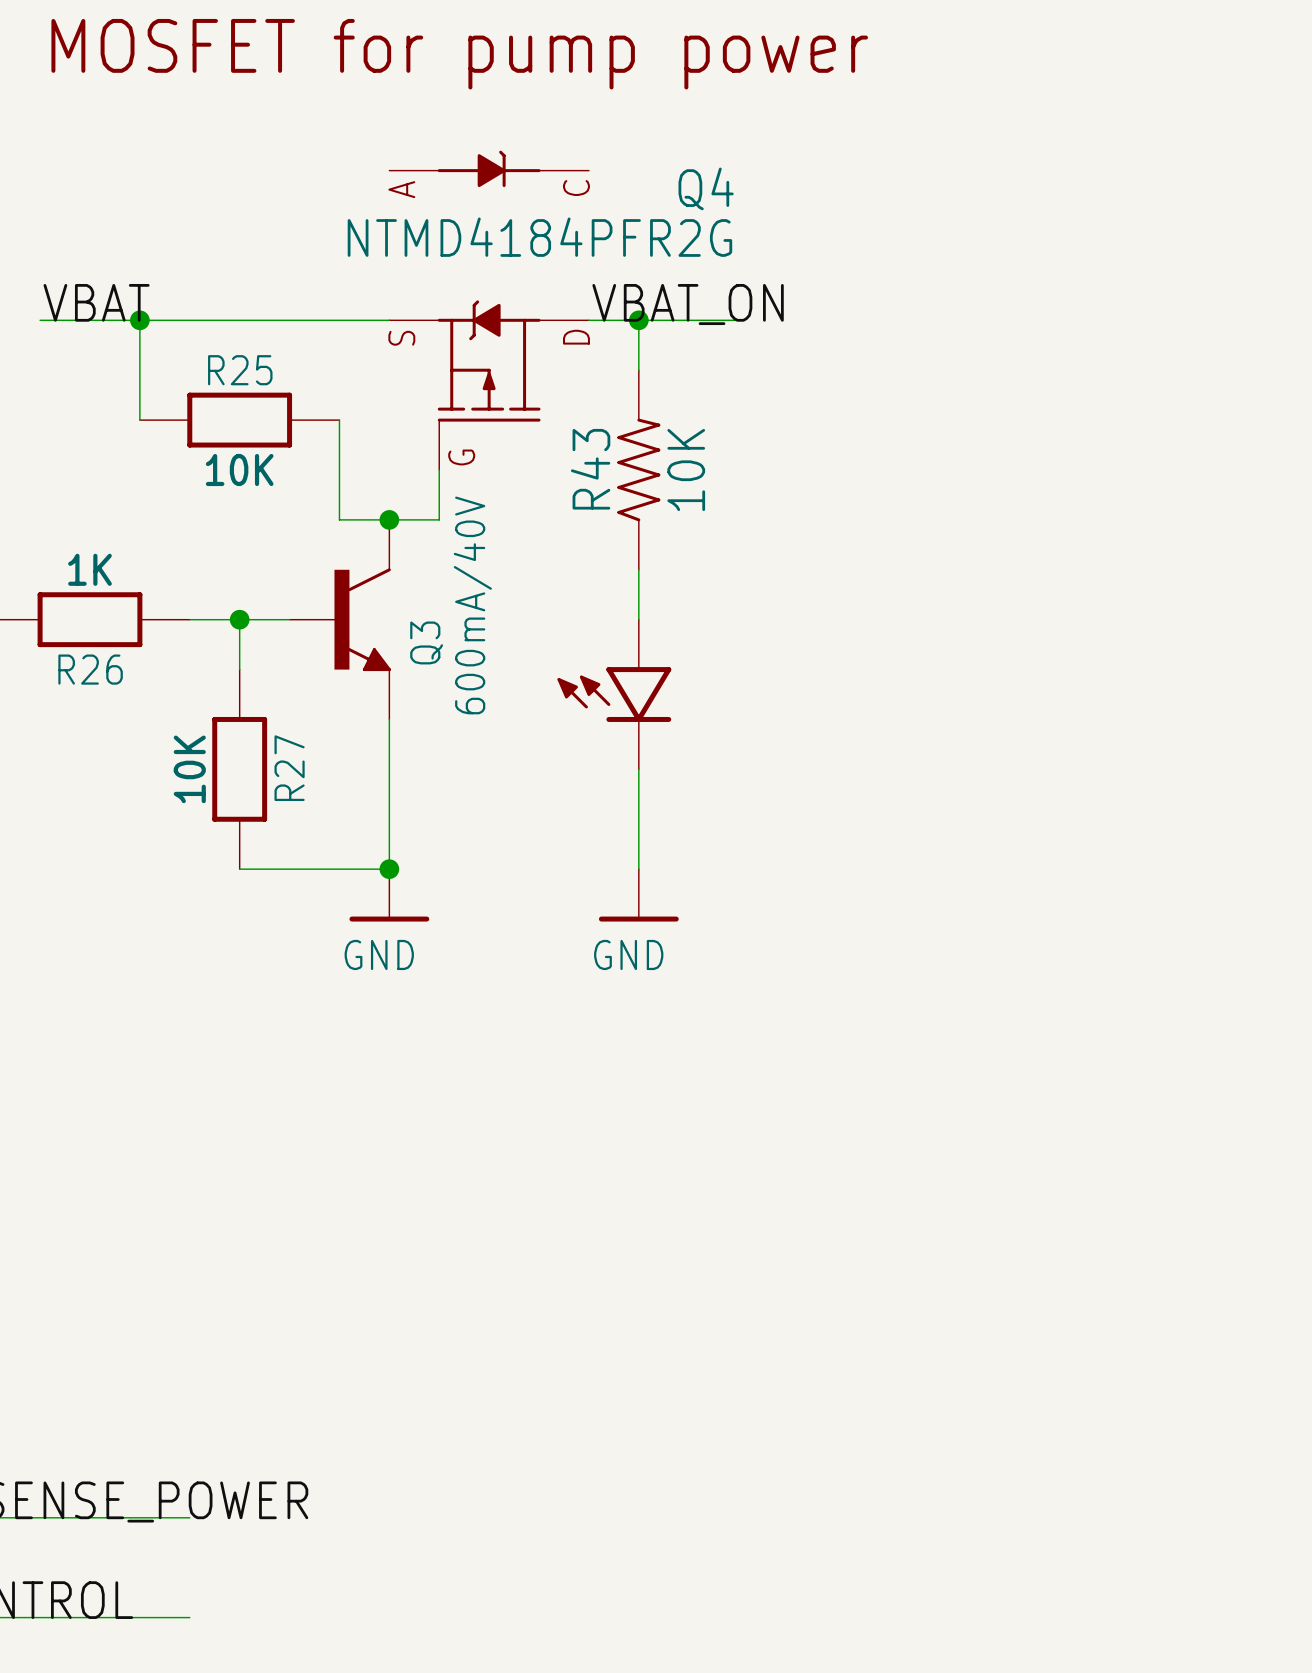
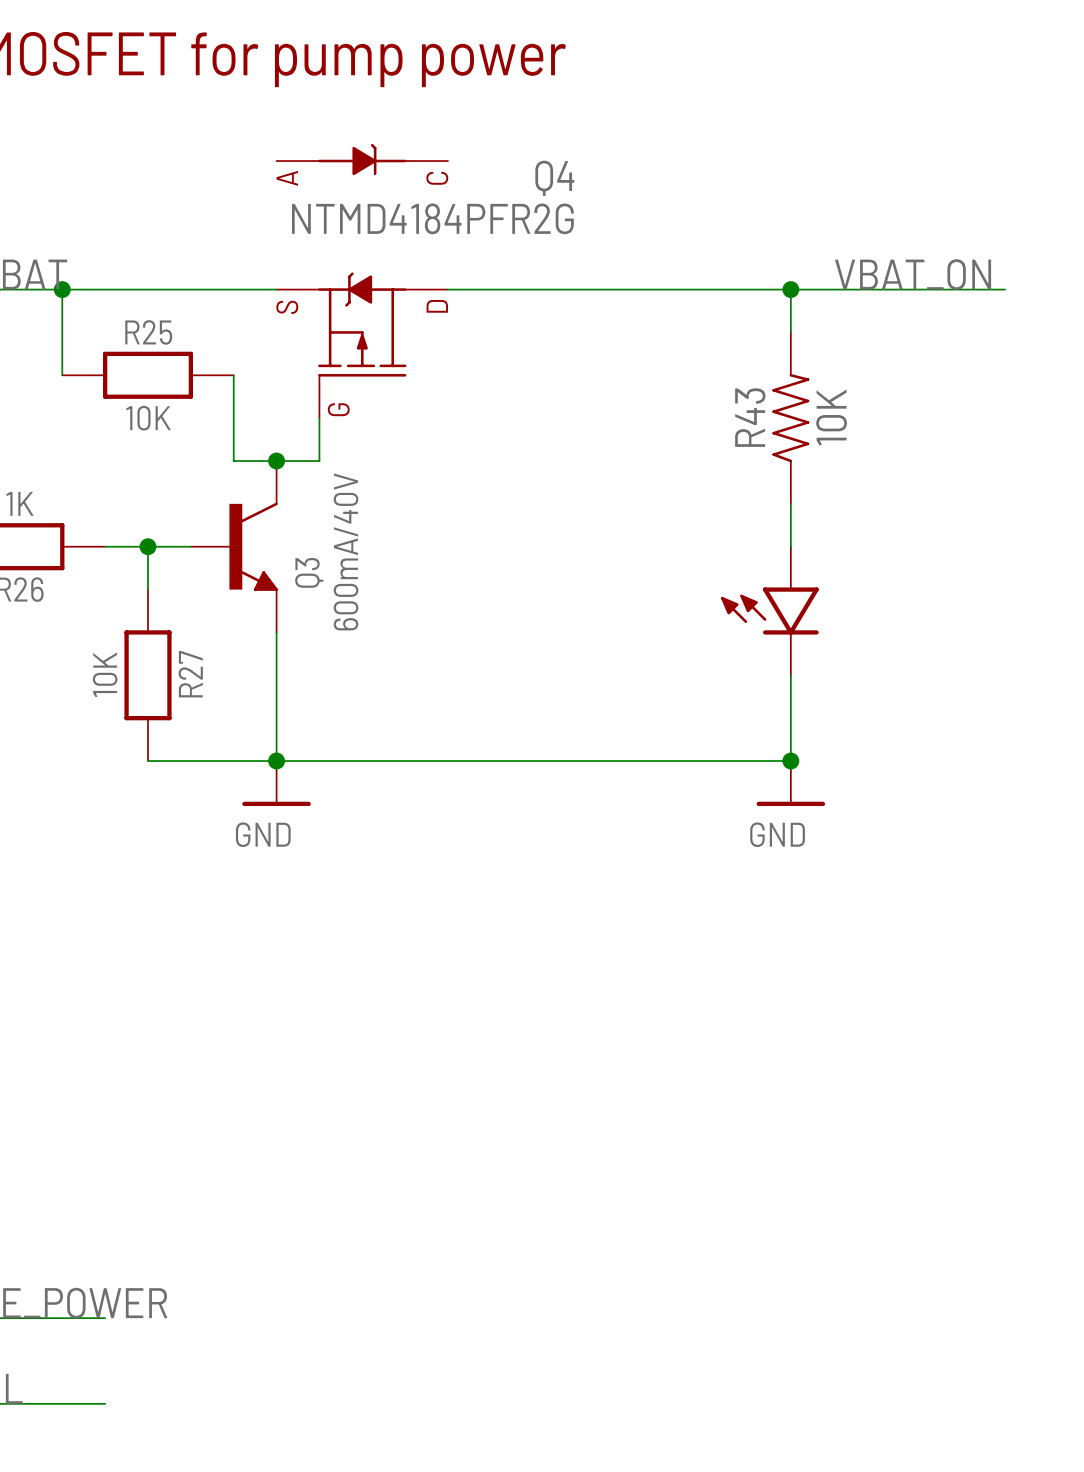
label position: VBAT_ON (688, 304) -> VBAT_ON (913, 274)
wire: (638, 320) (638, 370) -> (790, 289) (790, 332)
junction: (638, 320) -> none
wire: none -> (576, 289) (1005, 289)
junction: none -> (790, 289)
R43 position: (638, 470) -> (790, 418)
wire: (638, 569) (638, 619) -> (790, 503) (790, 546)
part position: (614, 694) -> (769, 611)
wire: (638, 769) (638, 869) -> none
wire: none -> (790, 675) (790, 761) (276, 761)
junction: none -> (790, 761)
power symbol position: GND (638, 895) -> GND (790, 783)

